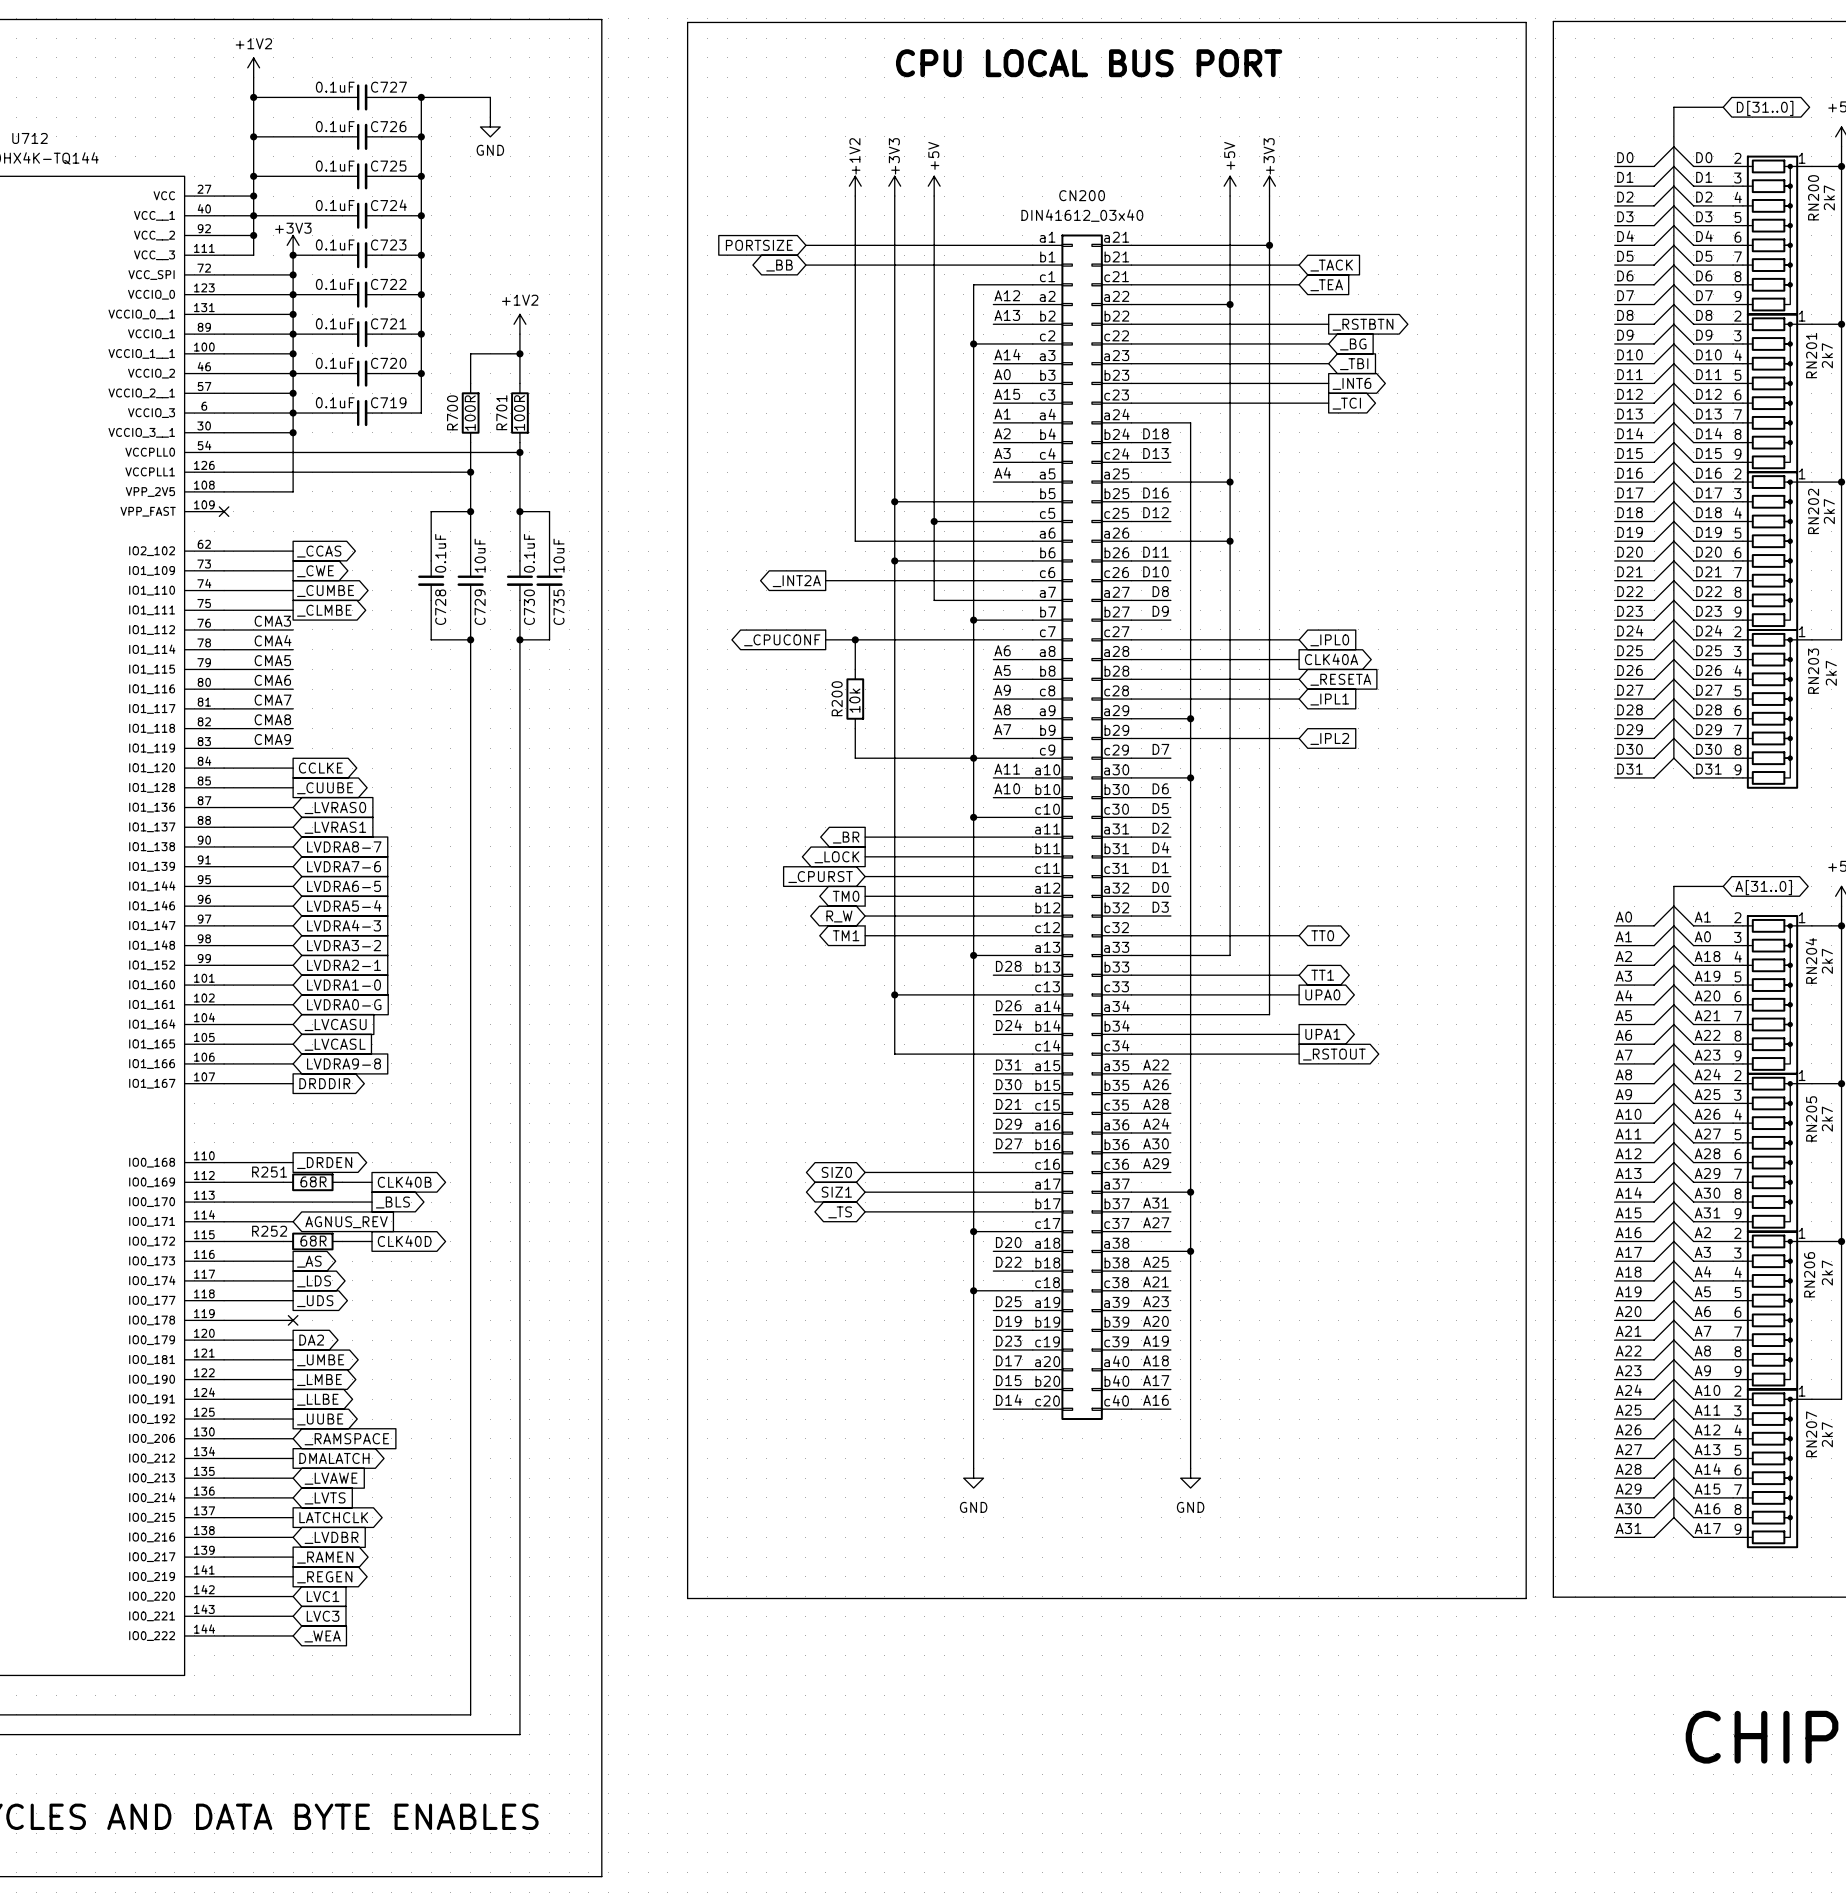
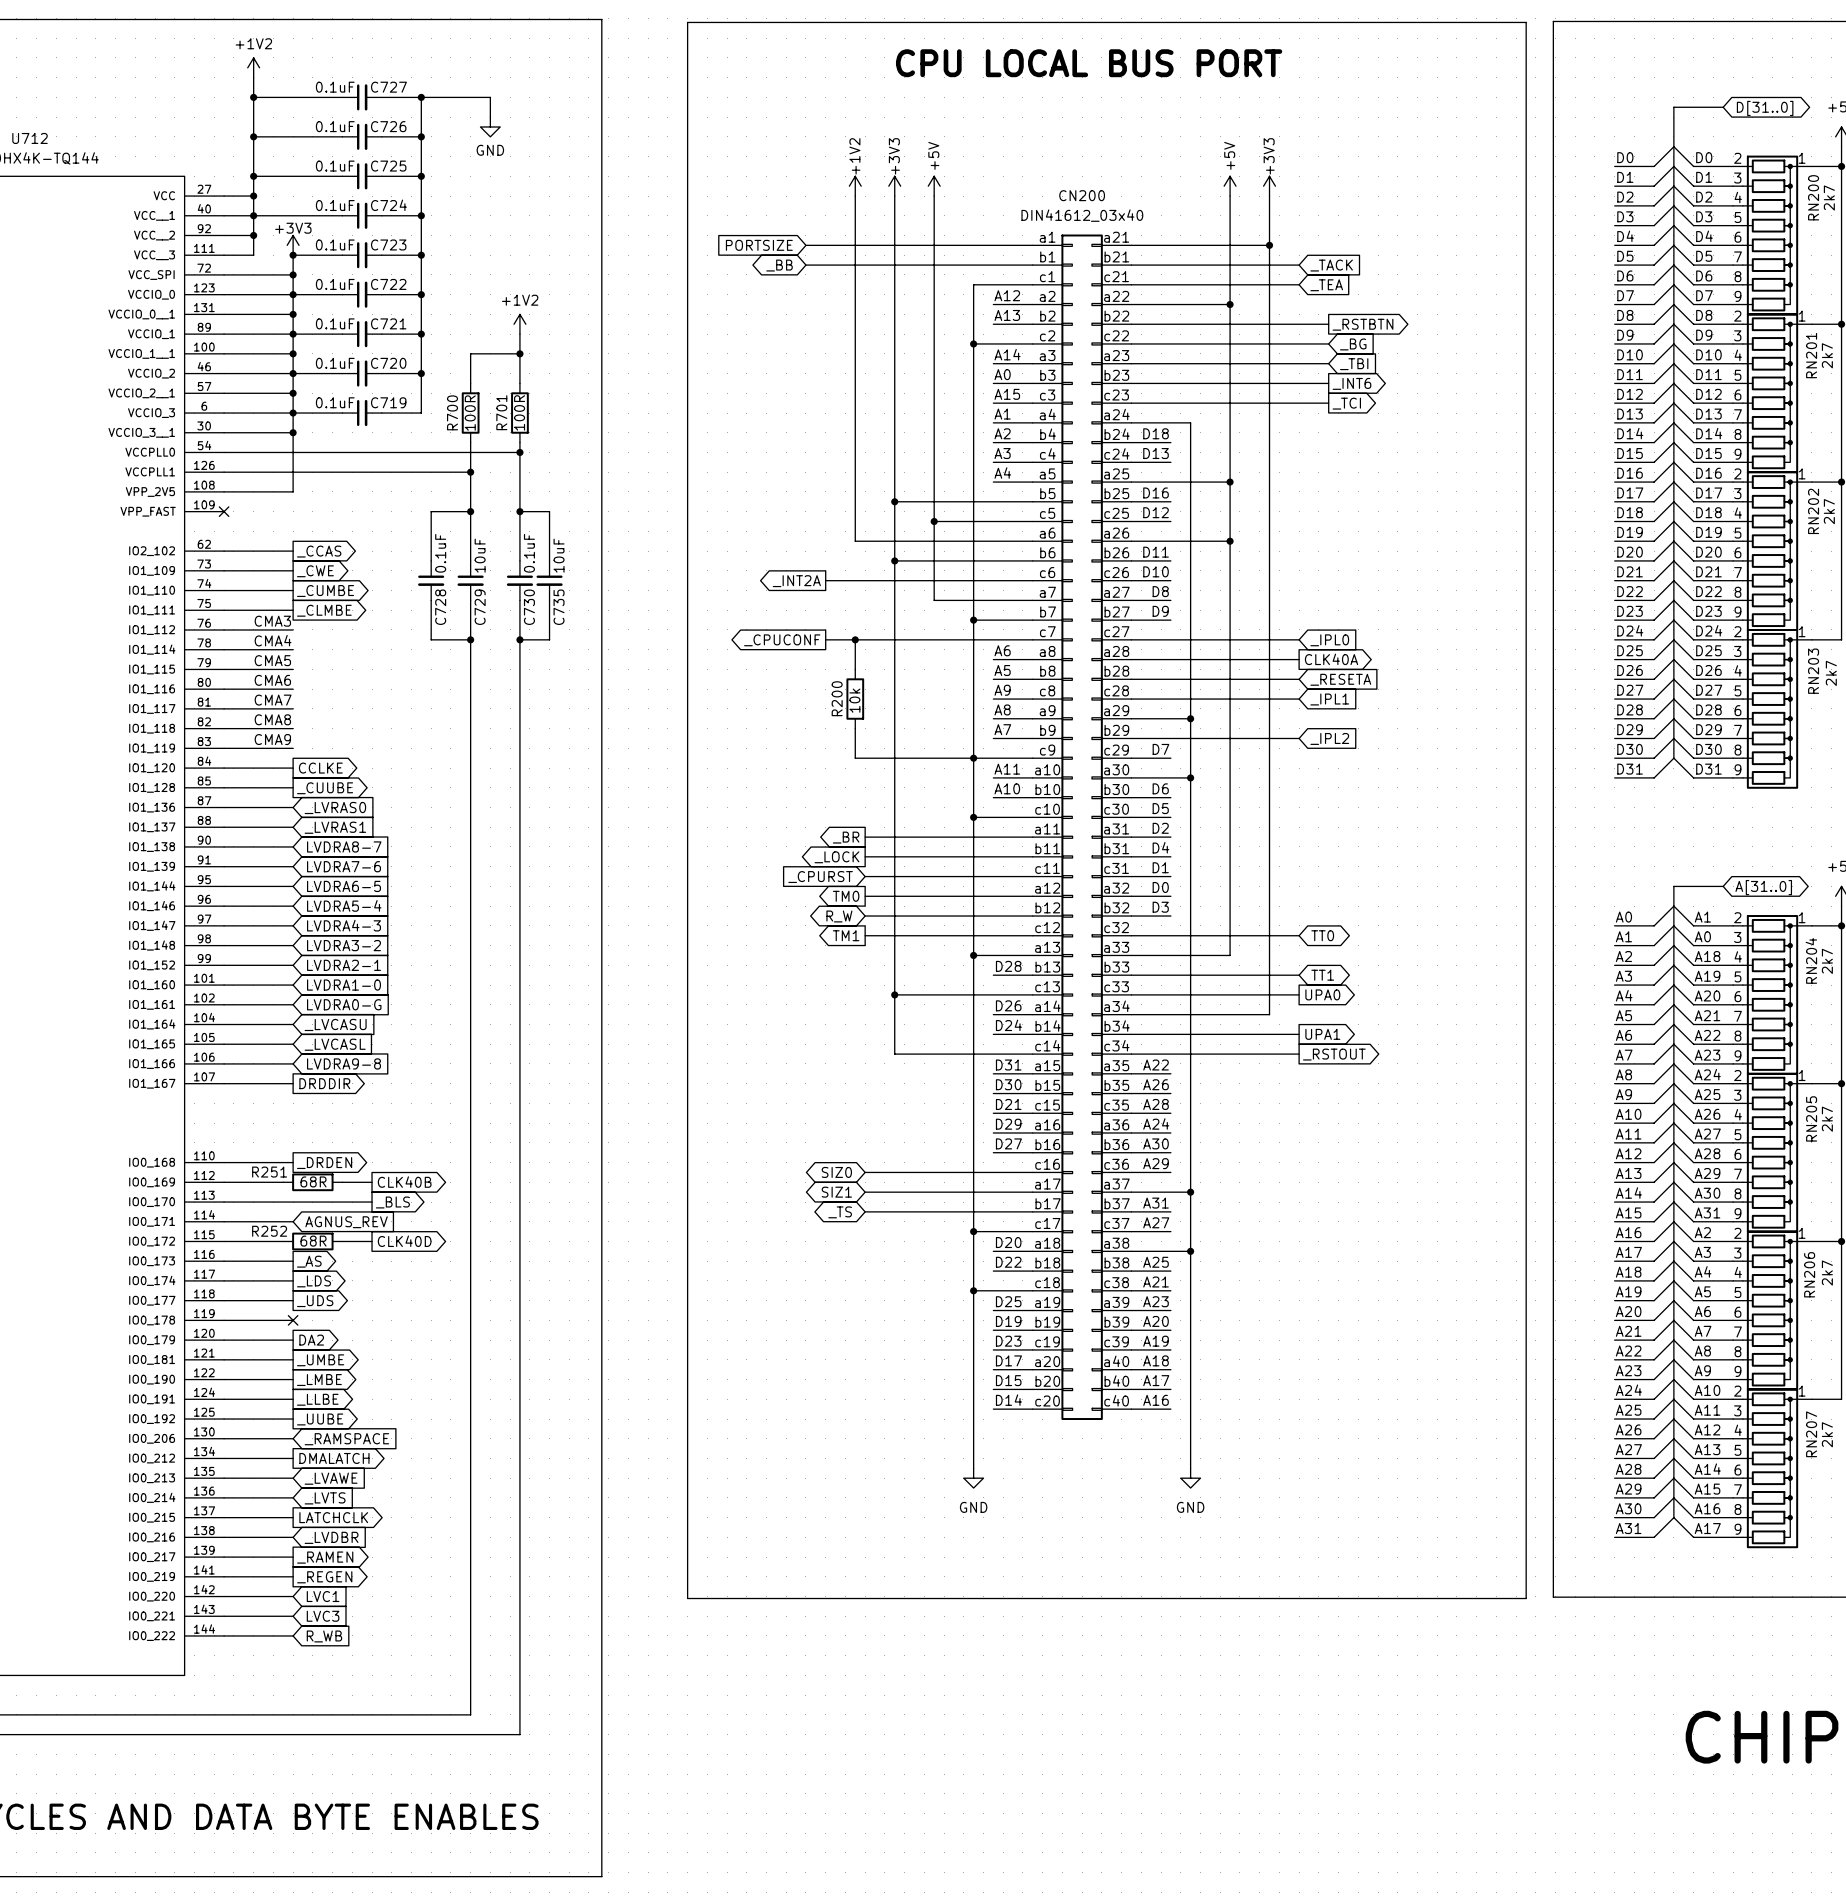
global label: _WEA (322, 1636) -> R_WB (324, 1636)

